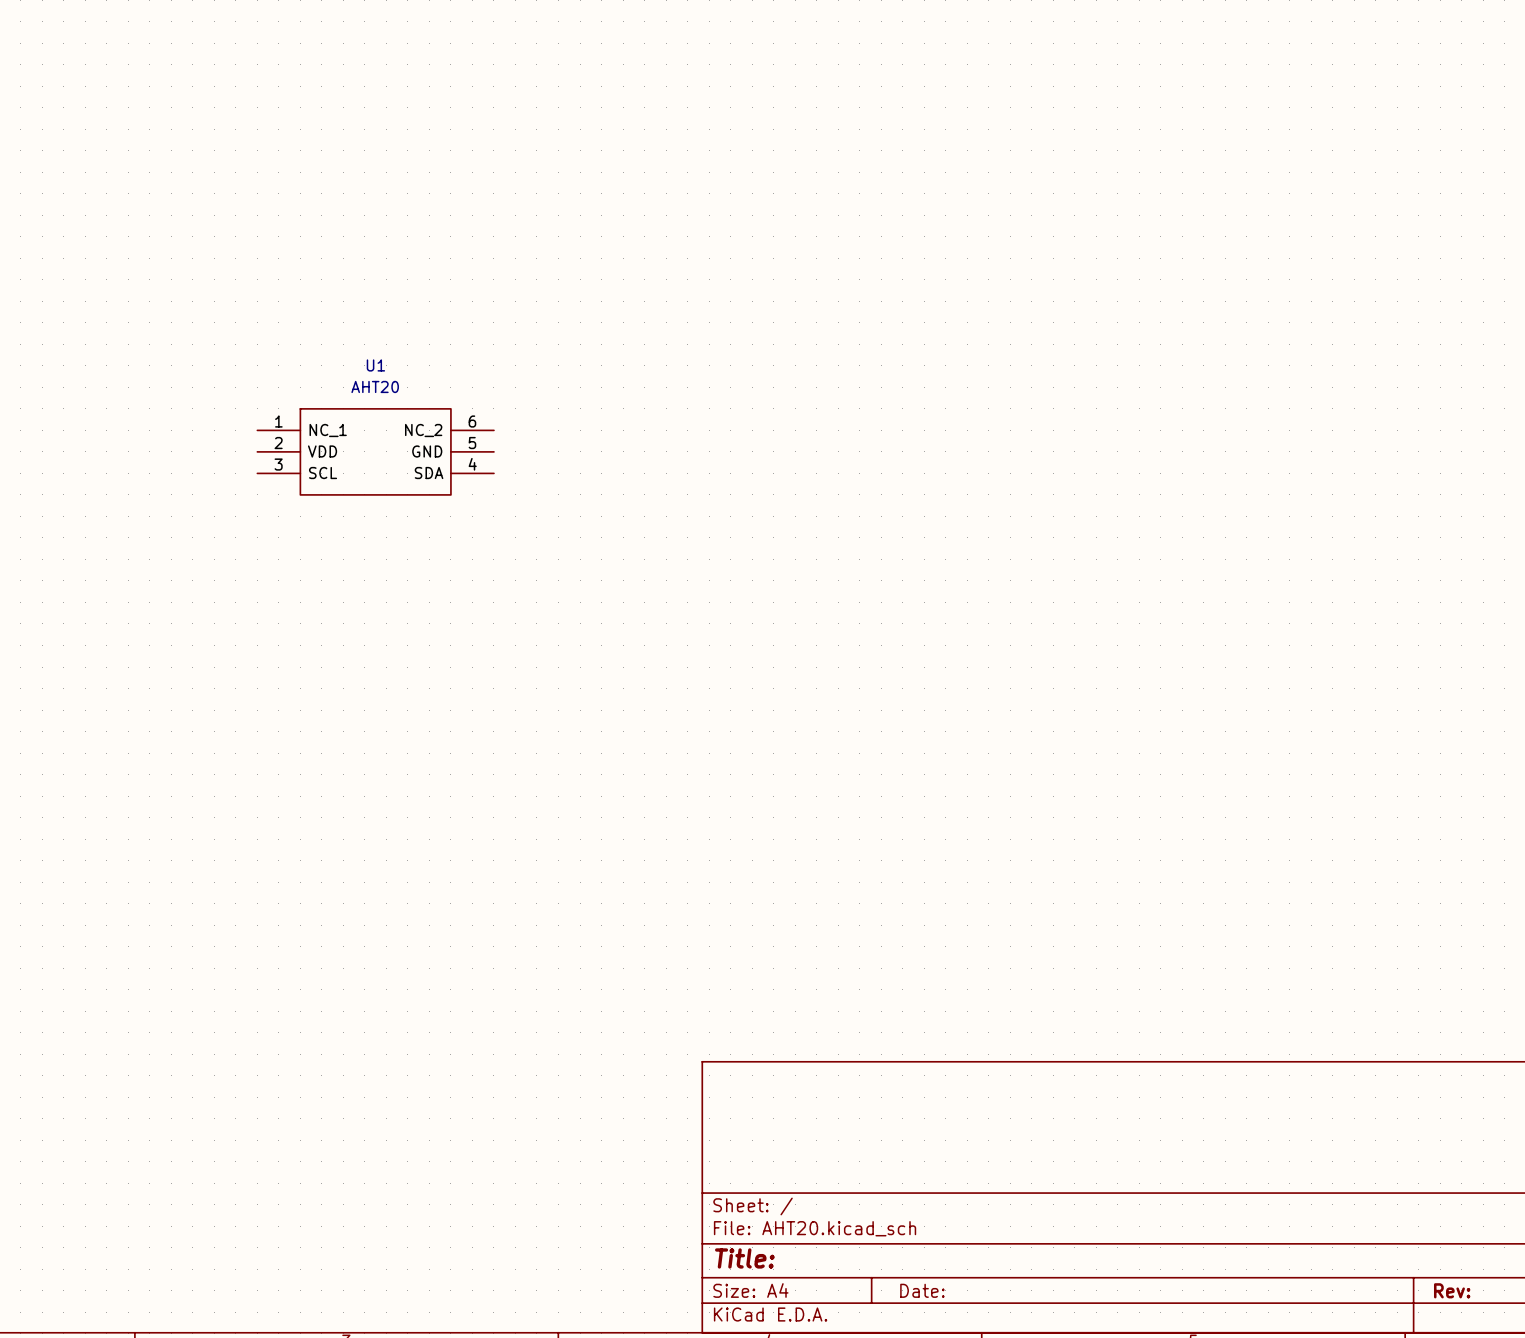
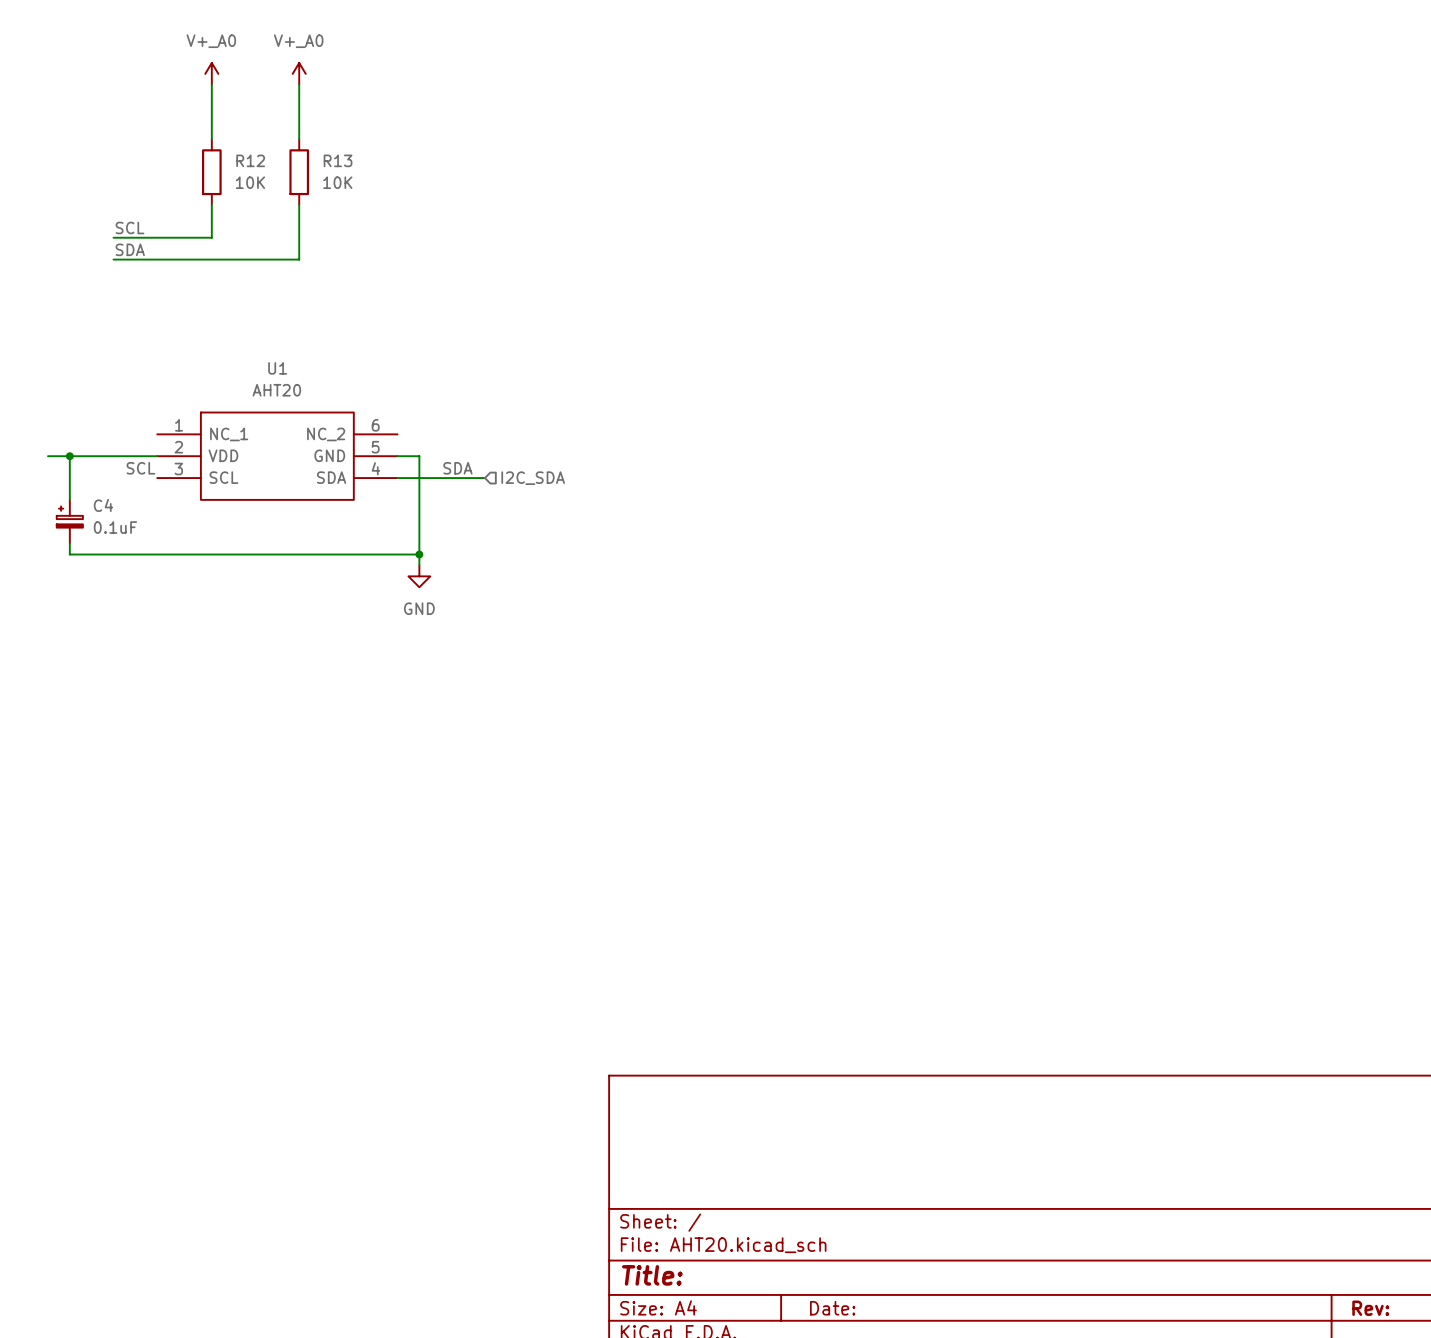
power symbol: none -> V+_A0 (211, 73)
power symbol: none -> V+_A0 (299, 73)
wire: none -> (211, 84) (211, 139)
wire: none -> (299, 84) (299, 139)
R12: none -> 10K (211, 172)
R13: none -> 10K (299, 172)
wire: none -> (211, 204) (211, 237) (113, 237)
wire: none -> (299, 204) (299, 259) (113, 259)
label: none -> SCL (129, 227)
label: none -> SDA (130, 249)
wire: none -> (47, 456) (157, 456)
wire: none -> (69, 456) (69, 499)
junction: none -> (69, 456)
wire: none -> (397, 456) (419, 456) (419, 565)
label: none -> SCL (140, 468)
label: none -> SDA (457, 468)
wire: none -> (397, 478) (484, 478)
hierarchical label: none -> I2C_SDA (533, 478)
C4: none -> 0.1uF (69, 521)
wire: none -> (69, 543) (69, 554) (419, 554)
junction: none -> (419, 554)
power symbol: none -> GND (419, 576)

